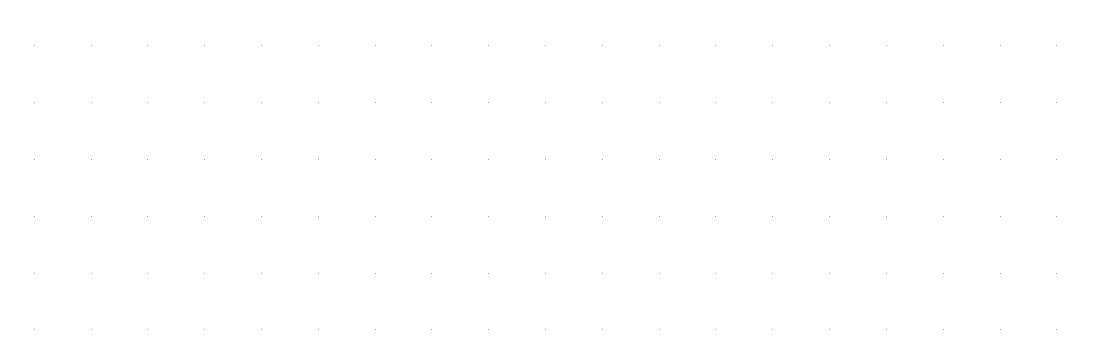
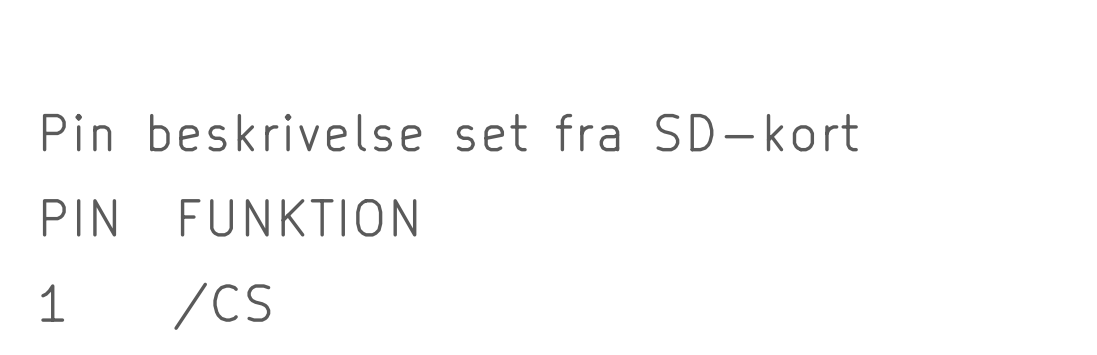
text: none -> Pin beskrivelse set fra SD-kort (450, 132)
text: none -> PIN FUNKTION (229, 217)
text: none -> 1 /CS (155, 306)

